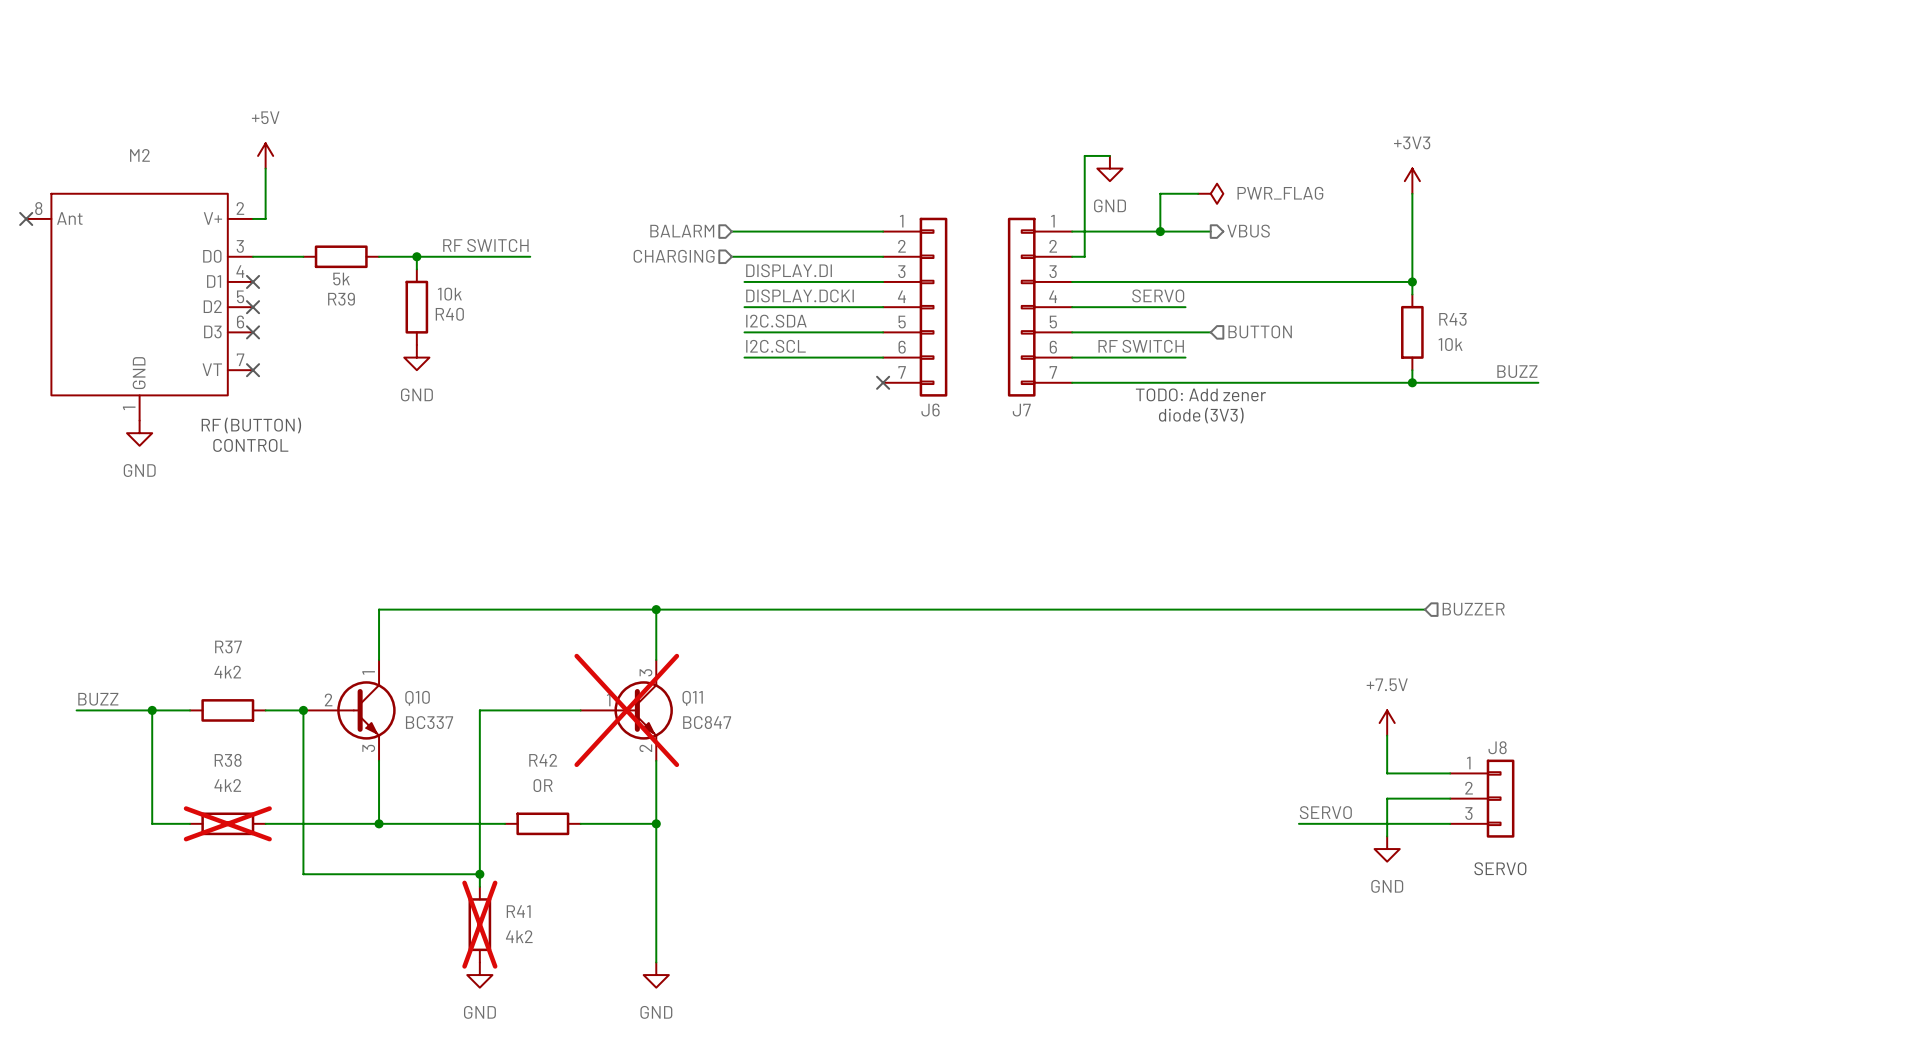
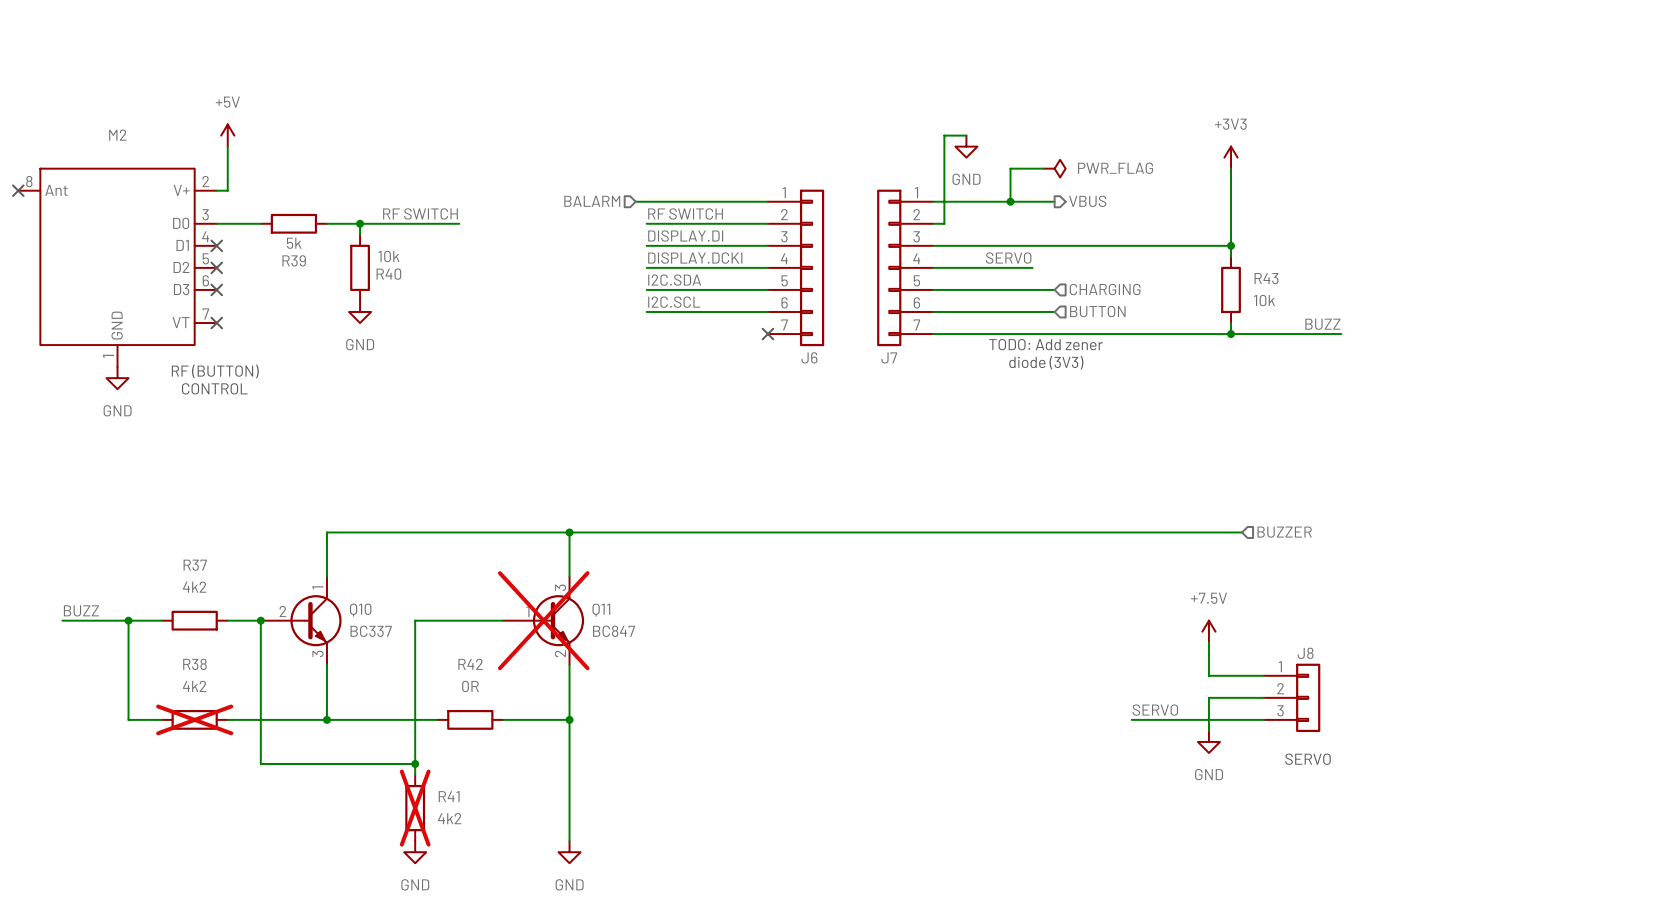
label: none -> RF SWITCH (685, 213)
hierarchical label: CHARGING (674, 256) -> none
wire: (731, 256) (744, 256) -> none
hierarchical label: BUTTON (1260, 331) -> CHARGING (1105, 289)
label: RF SWITCH (1141, 346) -> none
wire: none -> (1032, 311) (1054, 311)
hierarchical label: none -> BUTTON (1097, 311)

